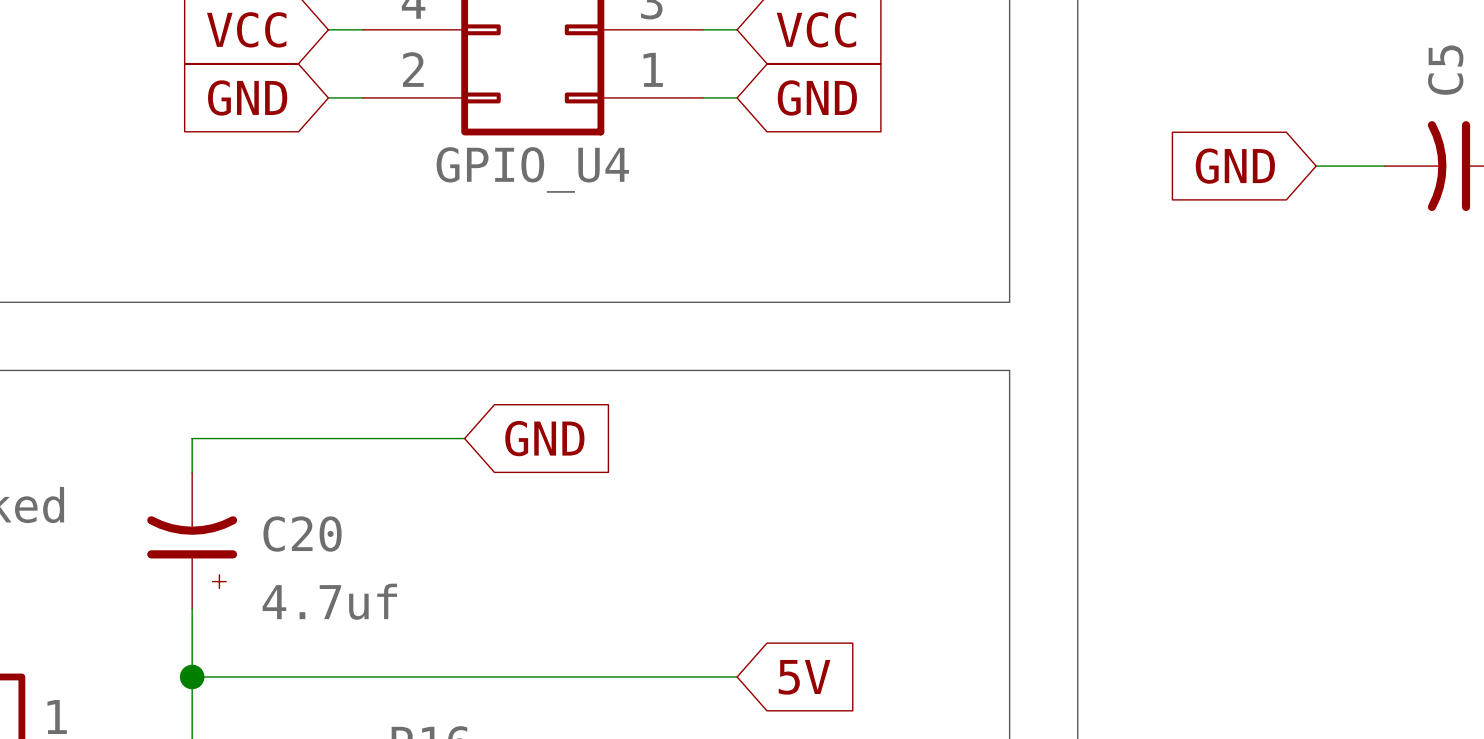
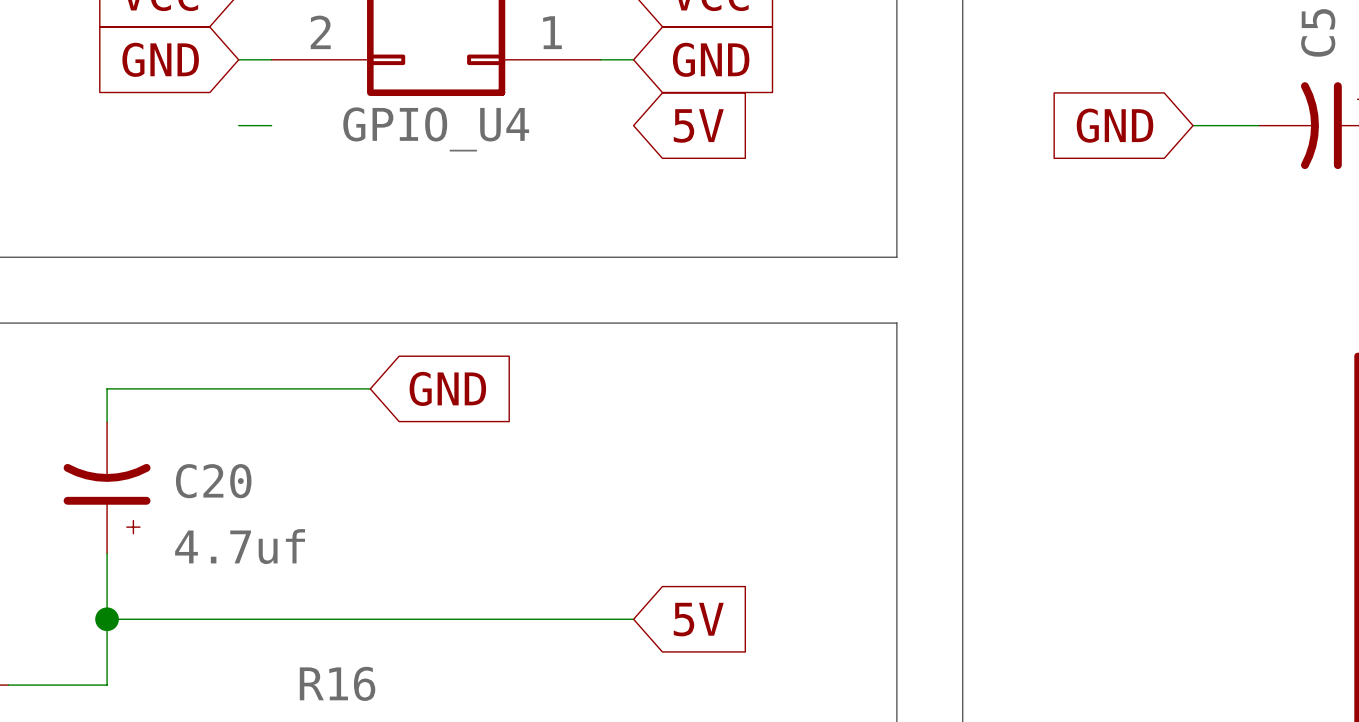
wire: none -> (238, 125) (271, 125)
global label: none -> 5V (698, 125)

